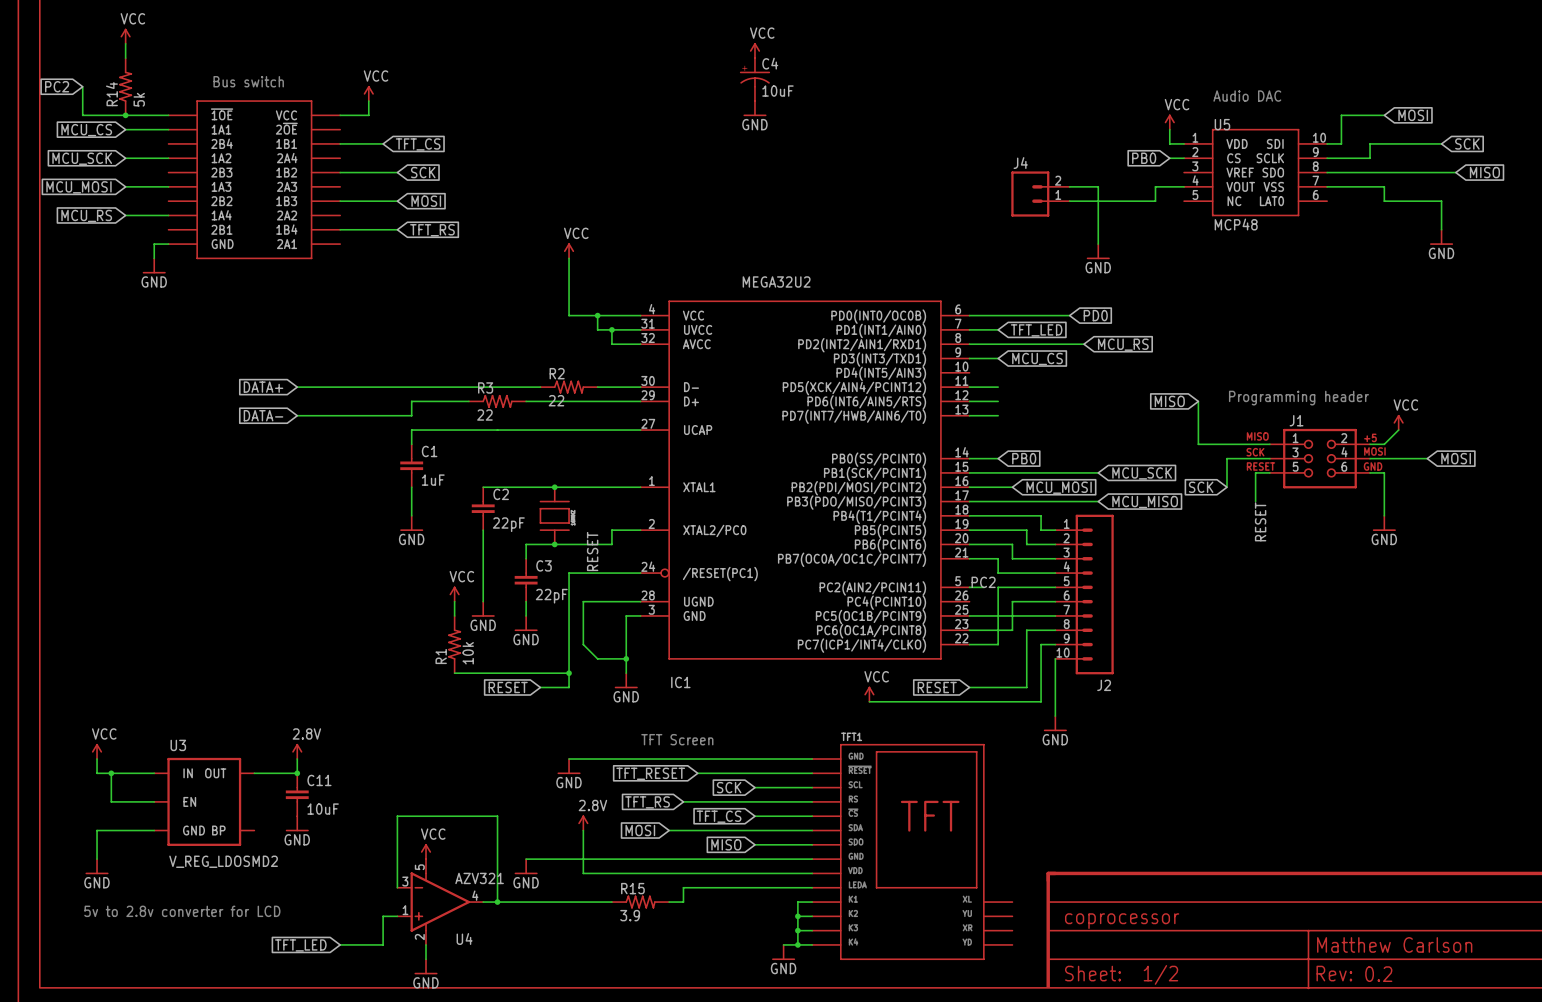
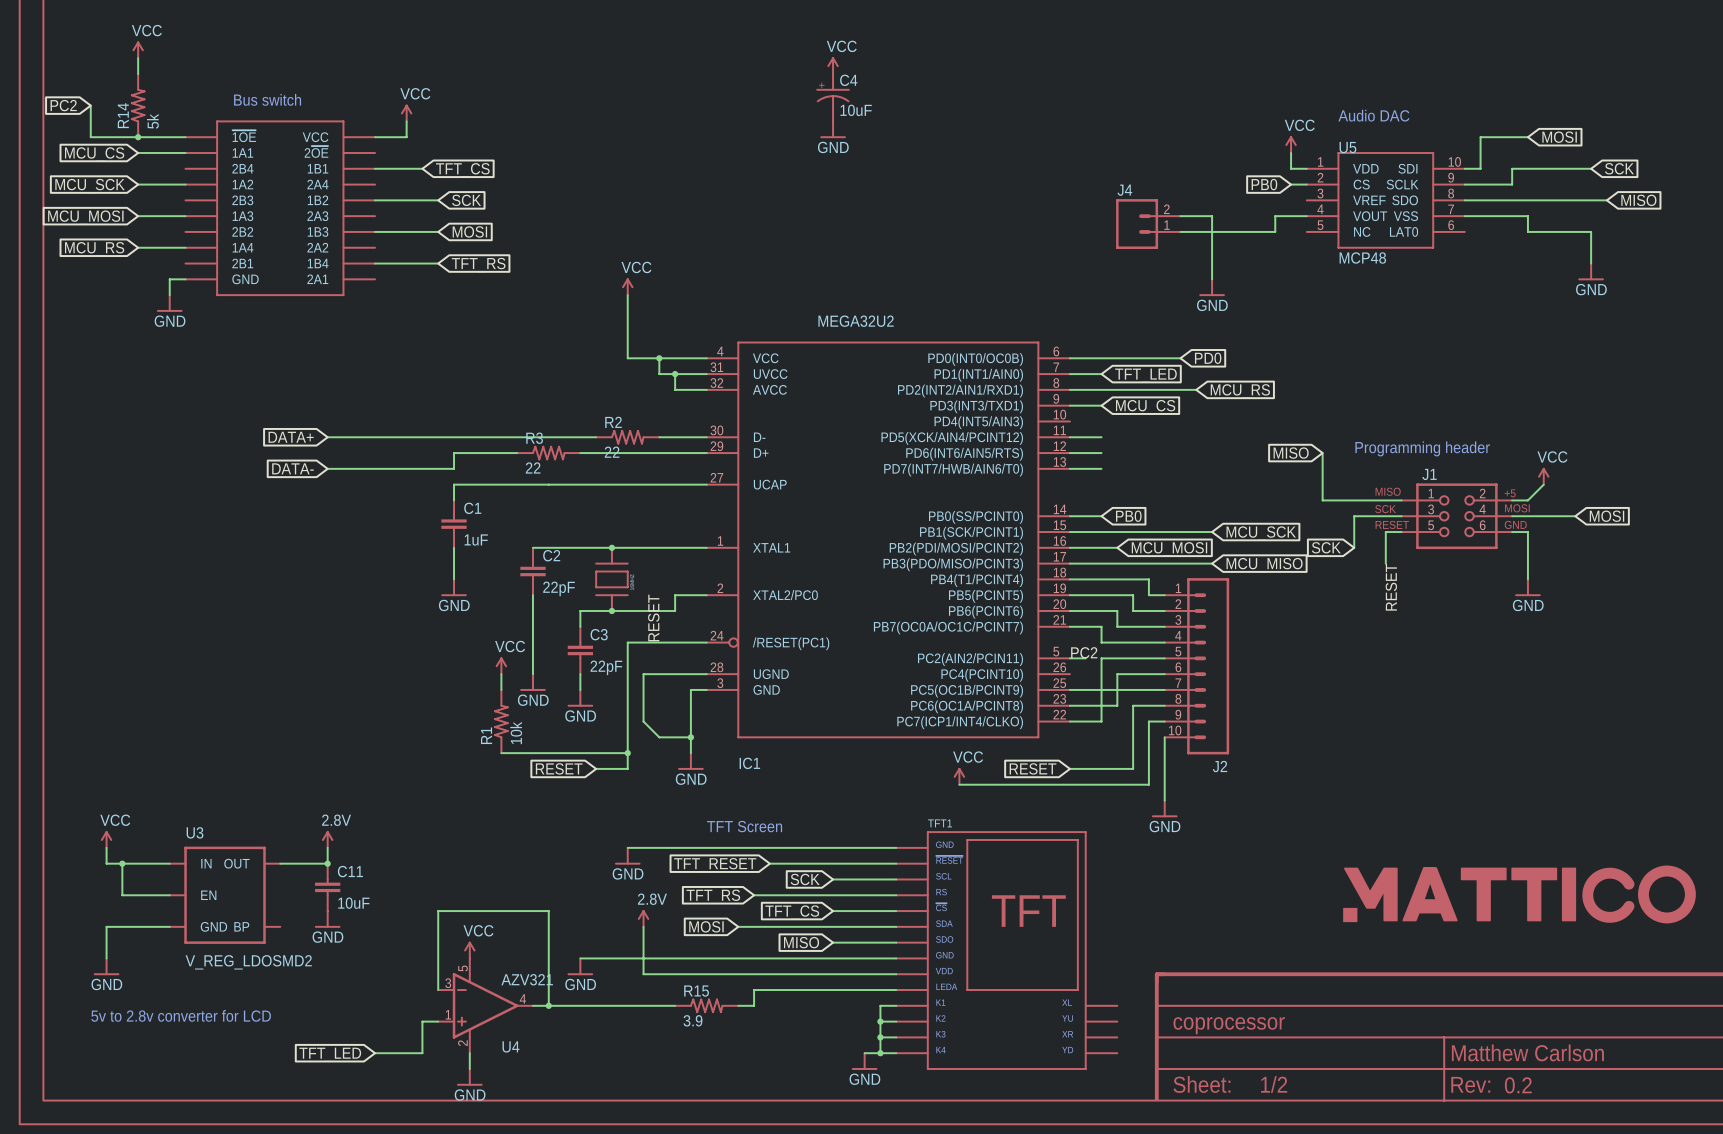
part: none -> (1519, 894)

